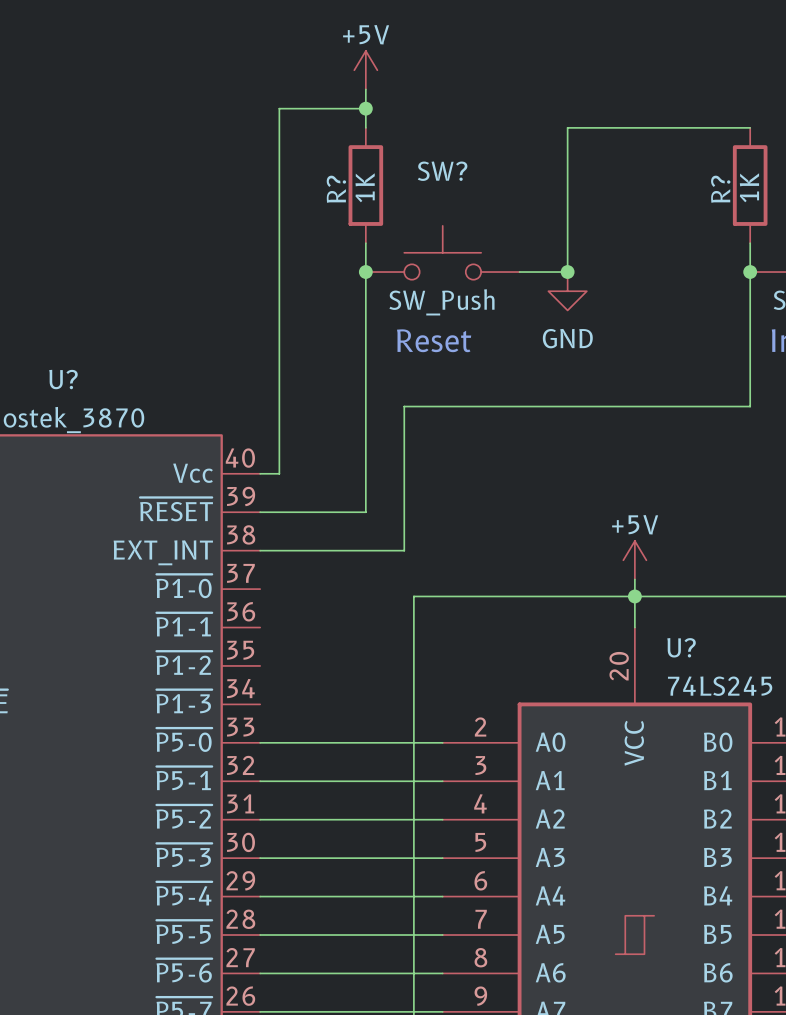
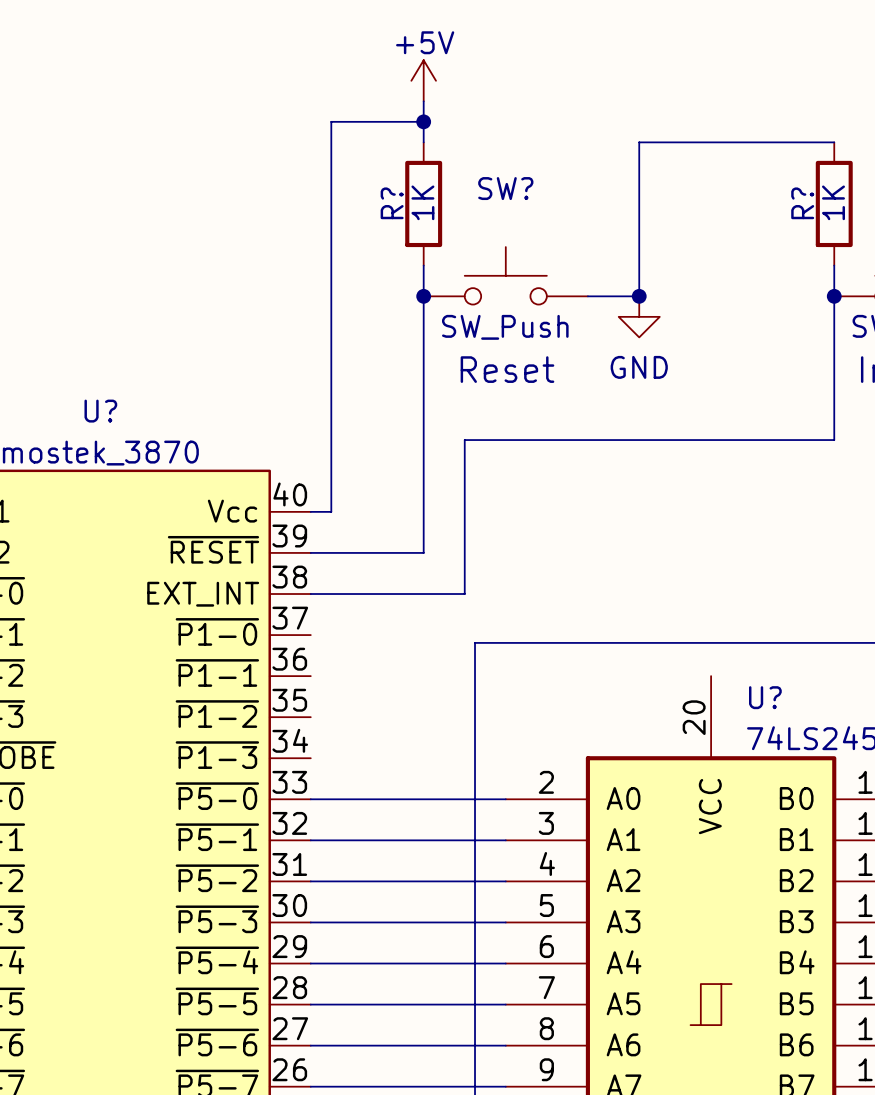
power symbol: +5V (634, 560) -> none
wire: (634, 579) (634, 627) -> none
junction: (634, 596) -> none

